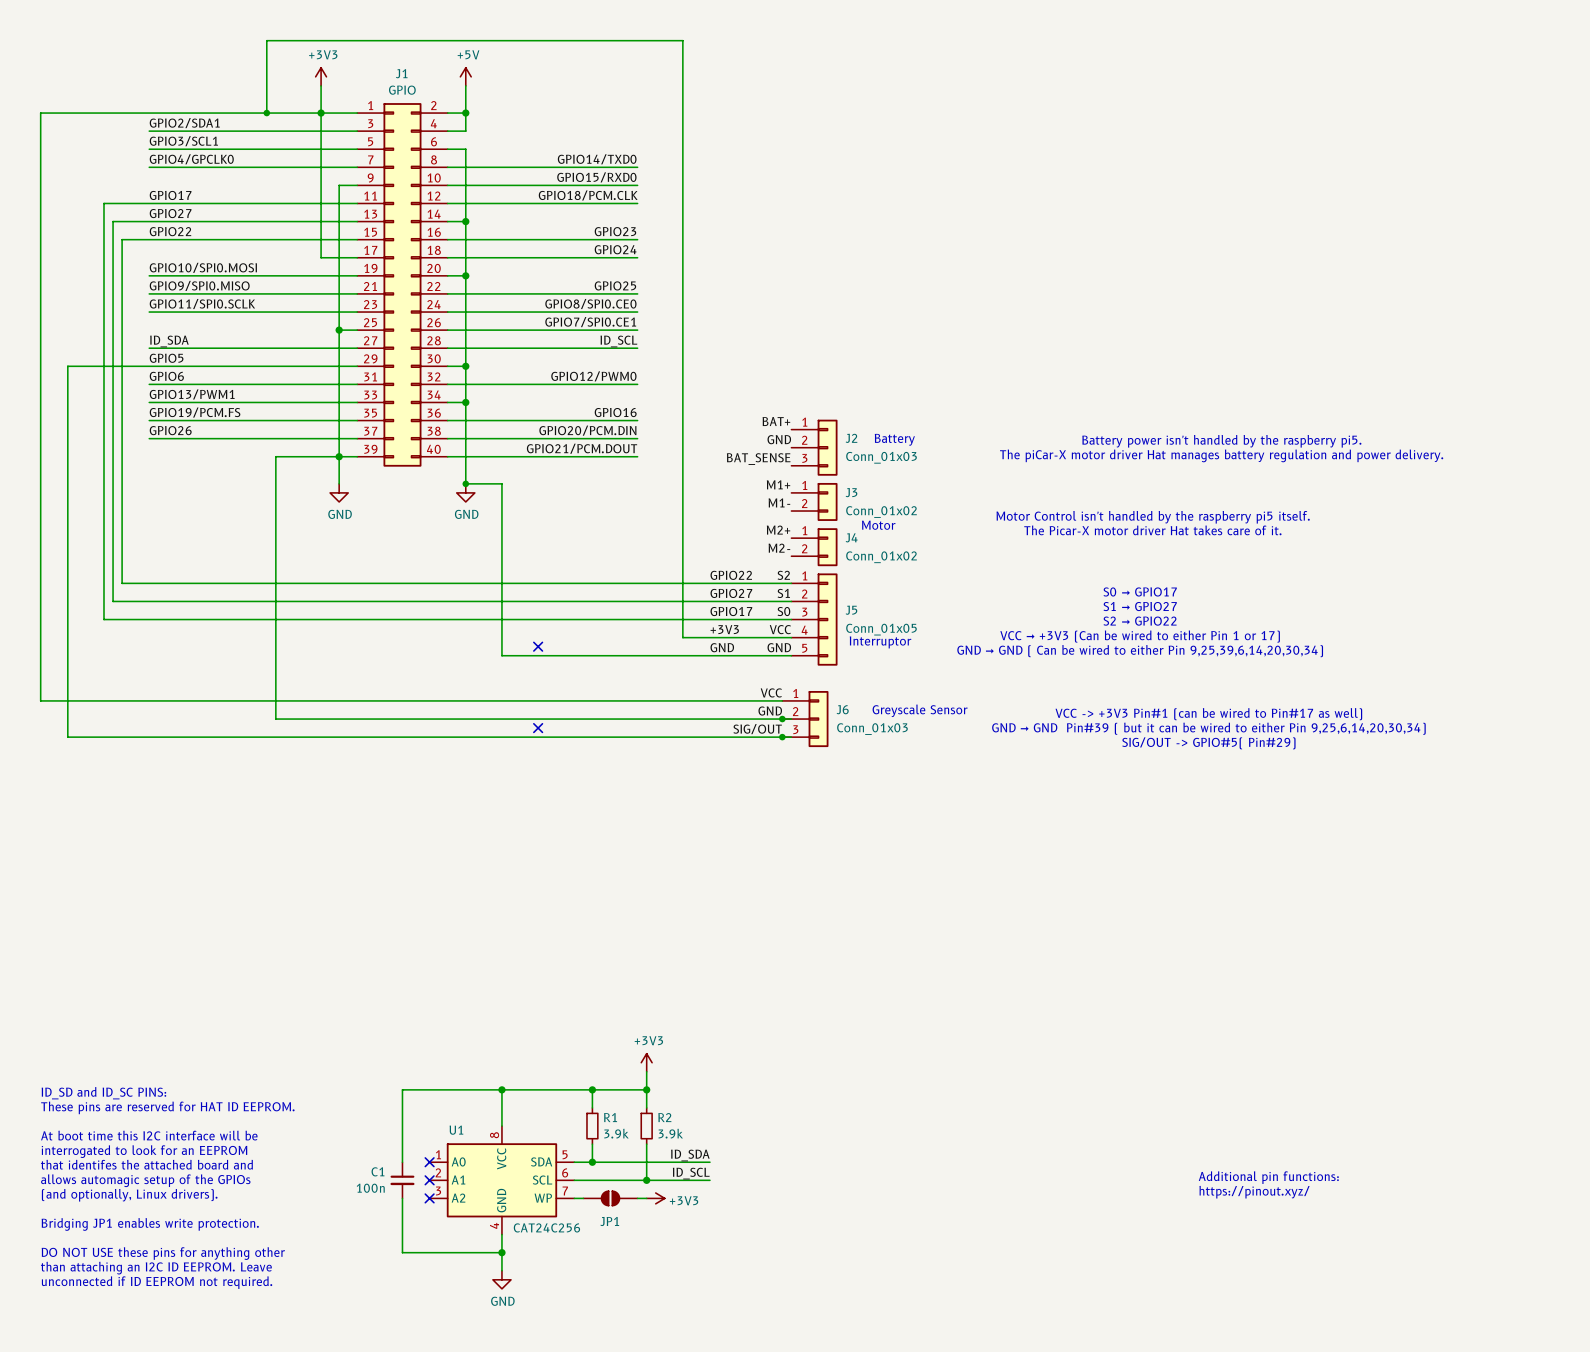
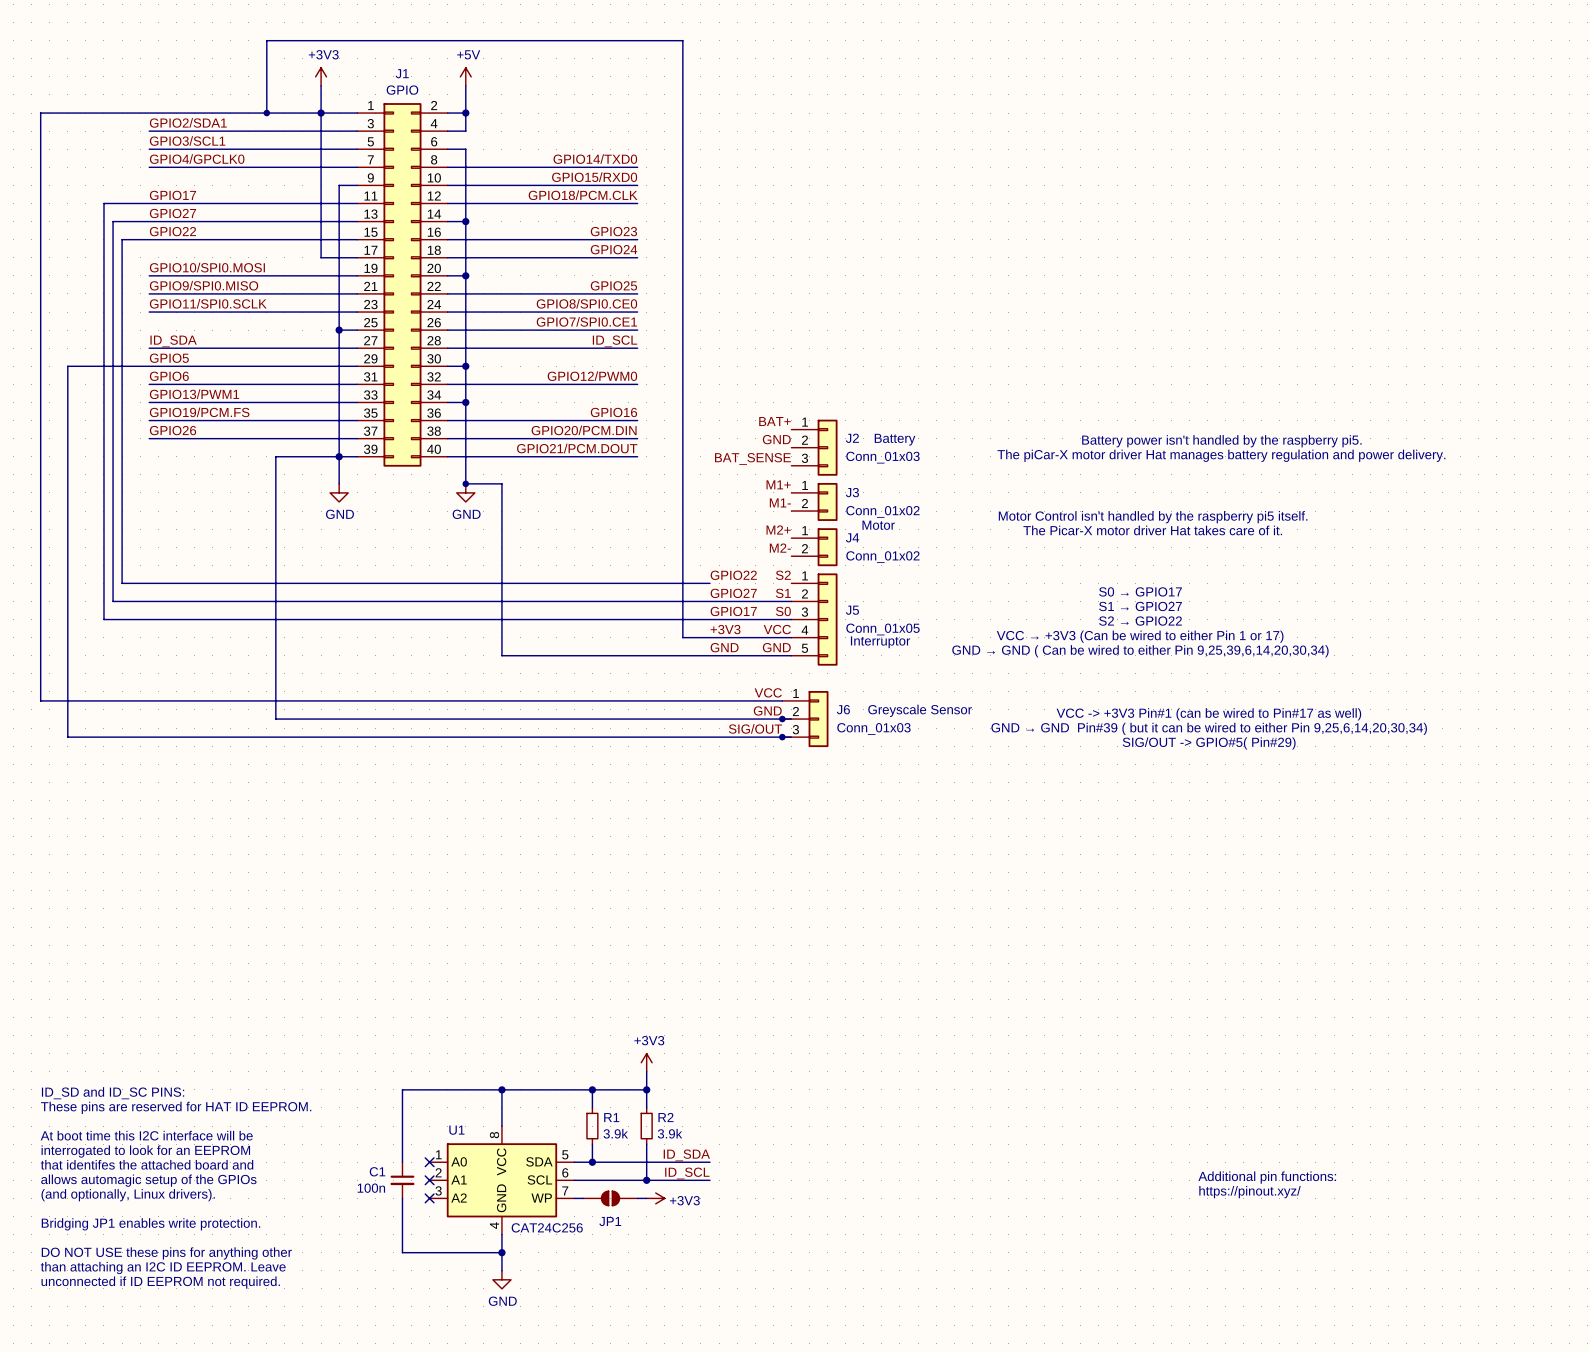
wire: (709, 583) (791, 583) -> none
no-connect mark: (538, 646) -> none
no-connect mark: (538, 728) -> none

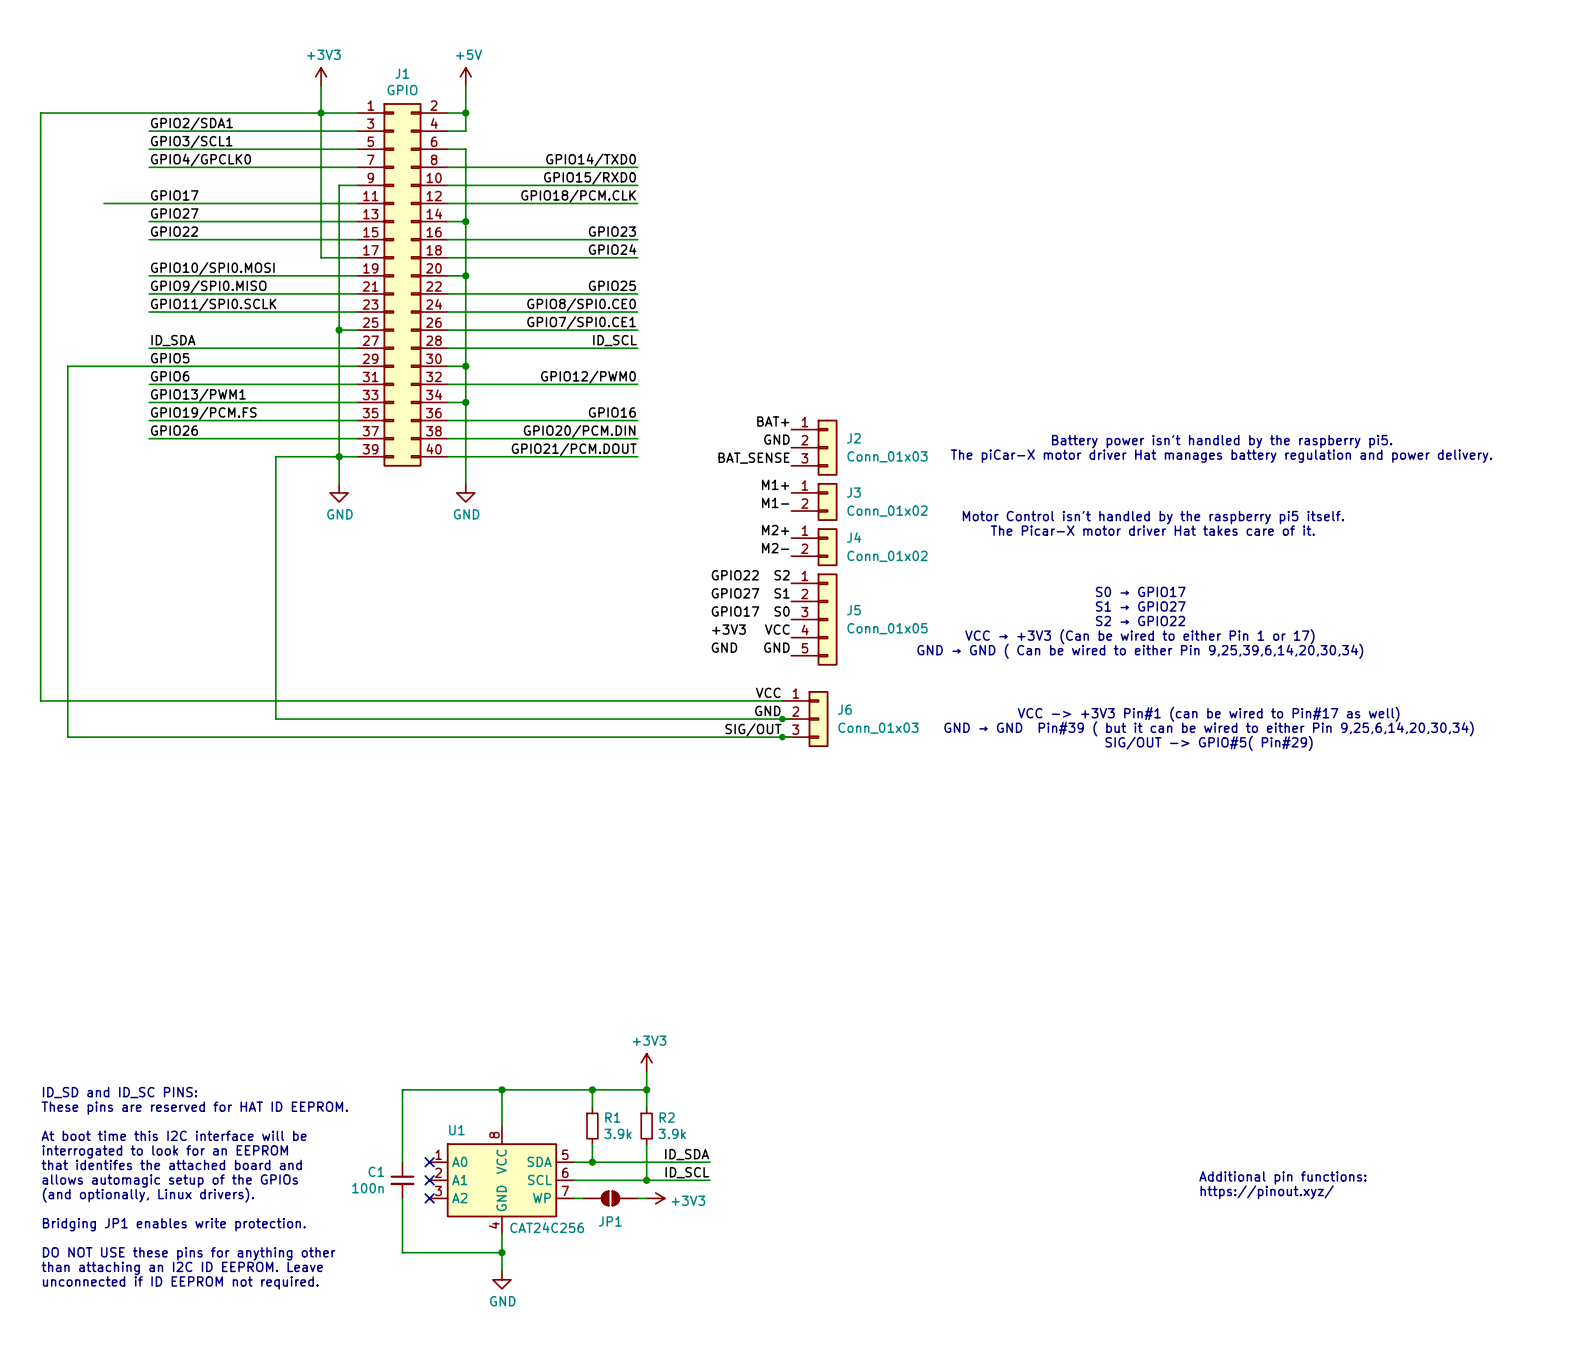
wire: (266, 113) (266, 40) (682, 40) (682, 637) (791, 637) -> none
junction: (266, 113) -> none
wire: (103, 203) (103, 619) (791, 619) -> none
wire: (149, 221) (113, 221) (113, 601) (791, 601) -> none
wire: (149, 239) (122, 239) (122, 583) (709, 583) -> none
text: Battery (895, 439) -> none
wire: (465, 483) (501, 483) (501, 655) (791, 655) -> none
junction: (465, 483) -> none
text: Motor (878, 525) -> none
text: Interruptor (880, 642) -> none
text: Greyscale Sensor (920, 710) -> none

